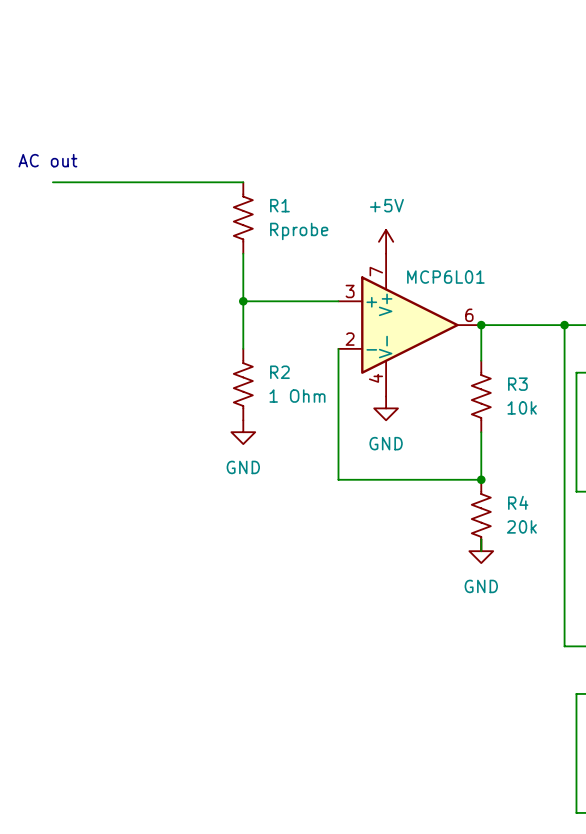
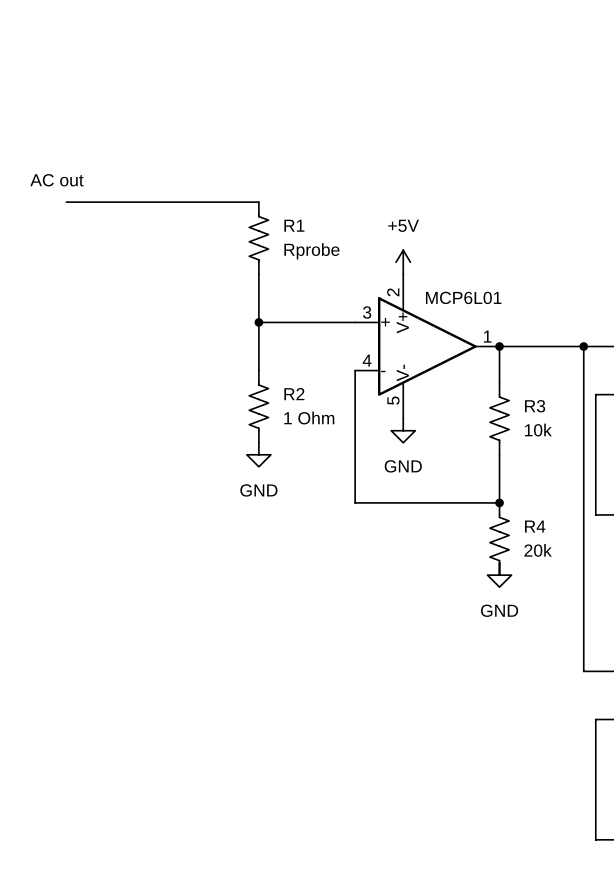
part pin number: 7 (376, 271) -> 2 (393, 292)
part pin number: 6 (469, 315) -> 1 (487, 336)
part pin number: 2 (350, 339) -> 4 (367, 360)
part pin number: 4 (375, 378) -> 5 (393, 400)

